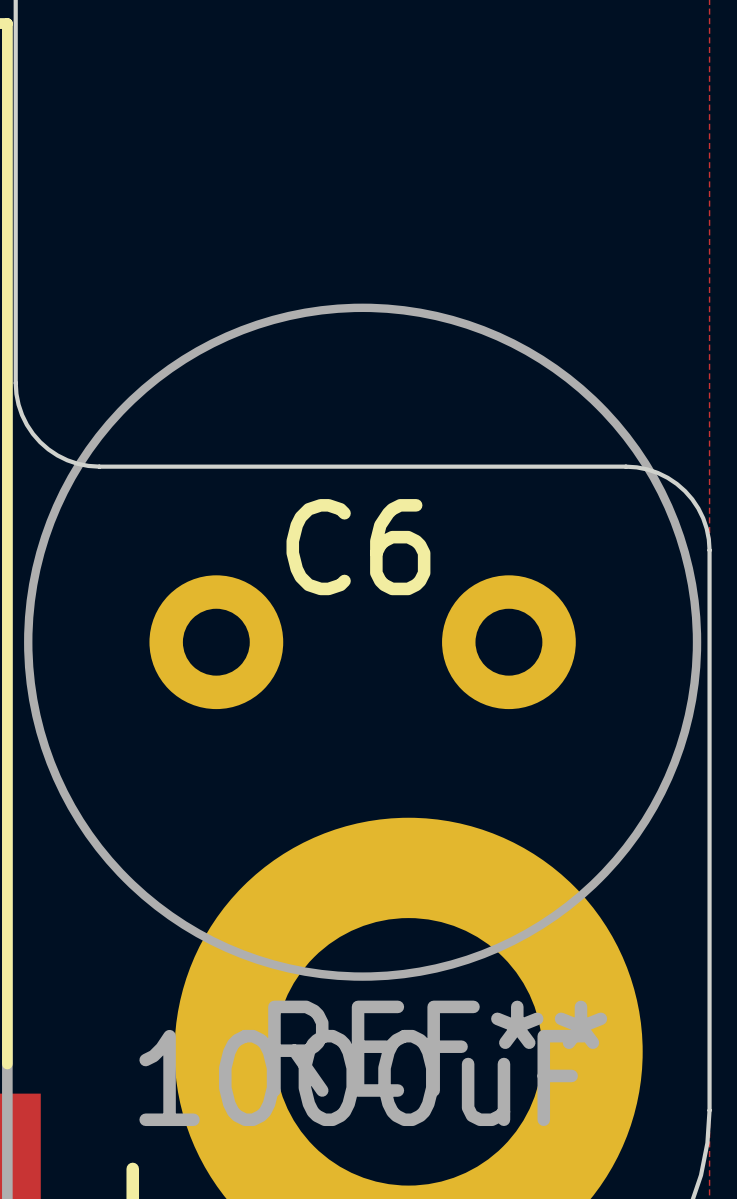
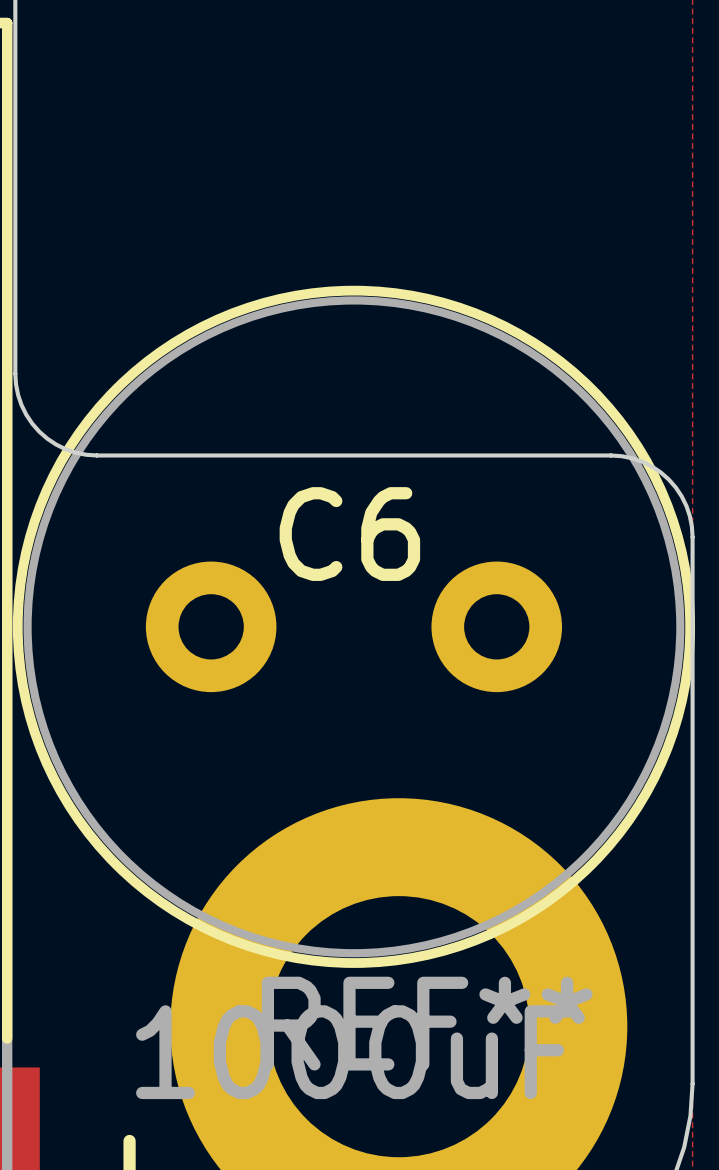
C6 footprint: [24, 303, 702, 981] -> [12, 285, 696, 968]

